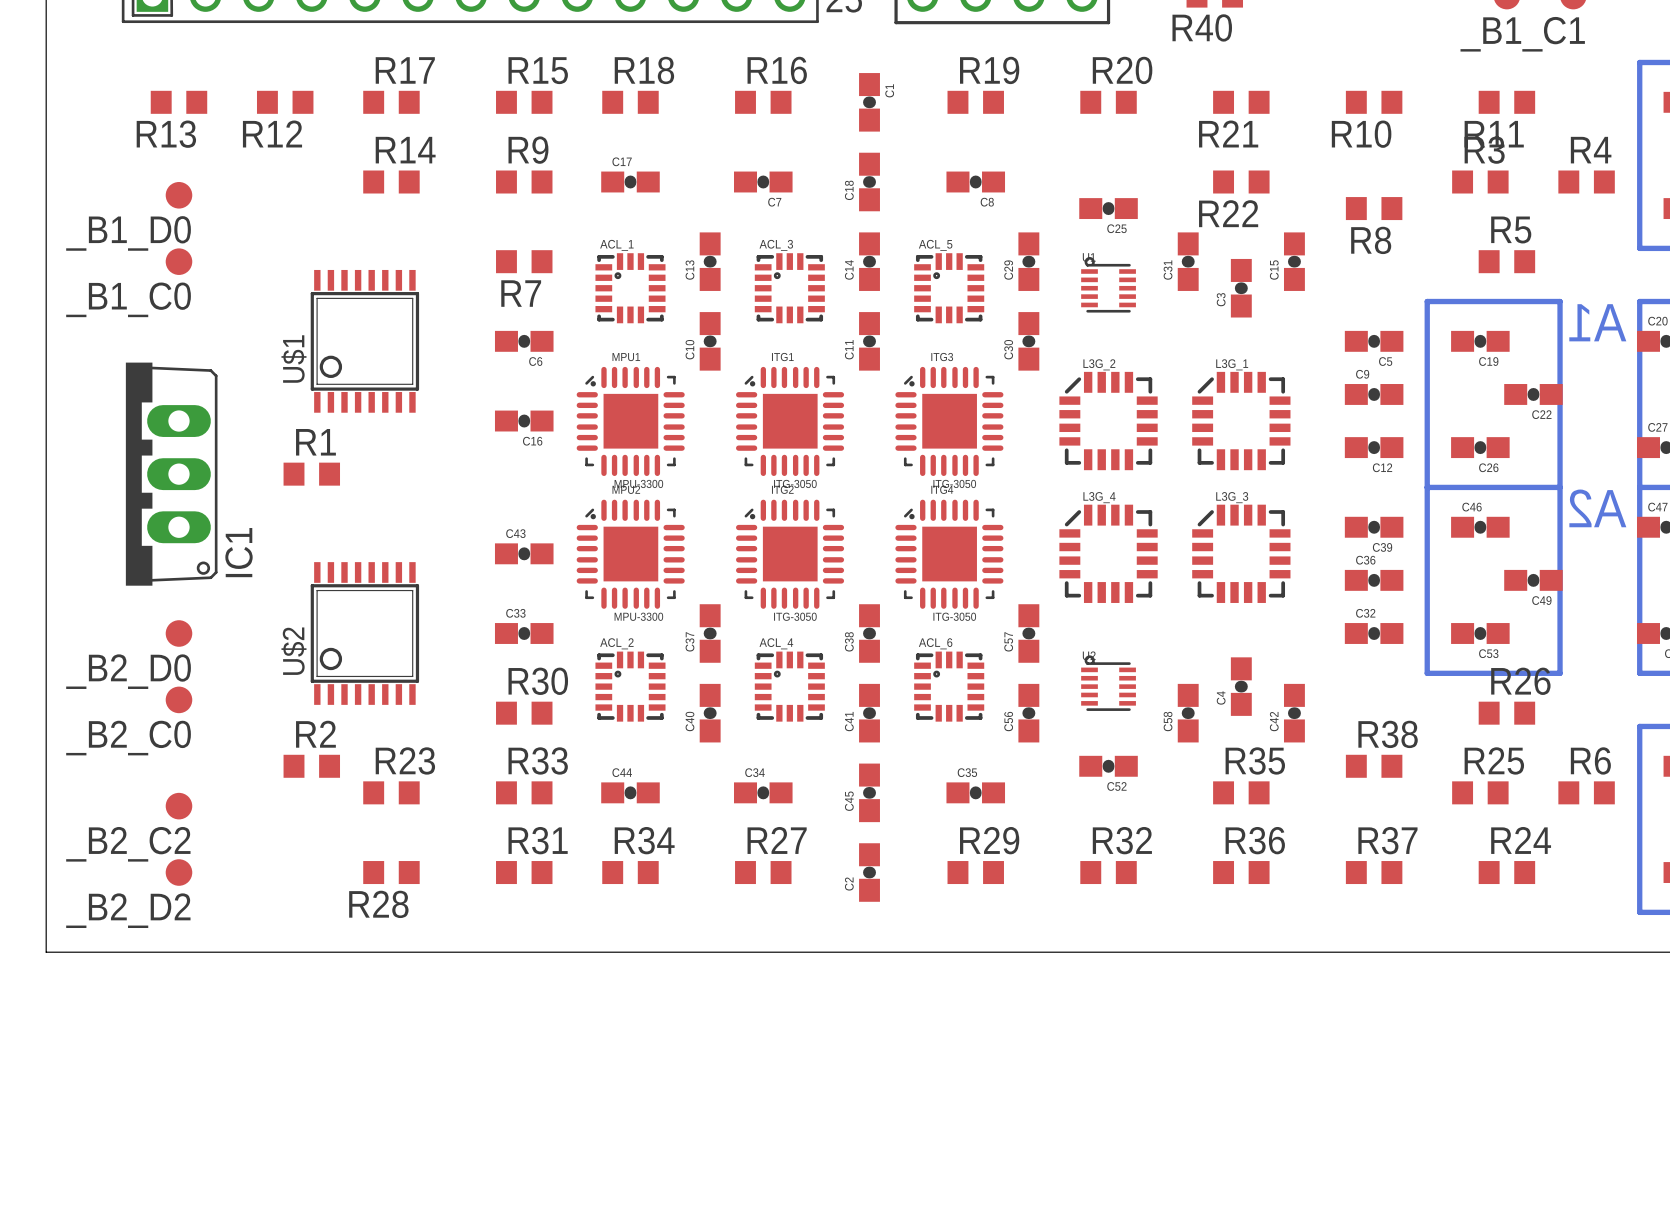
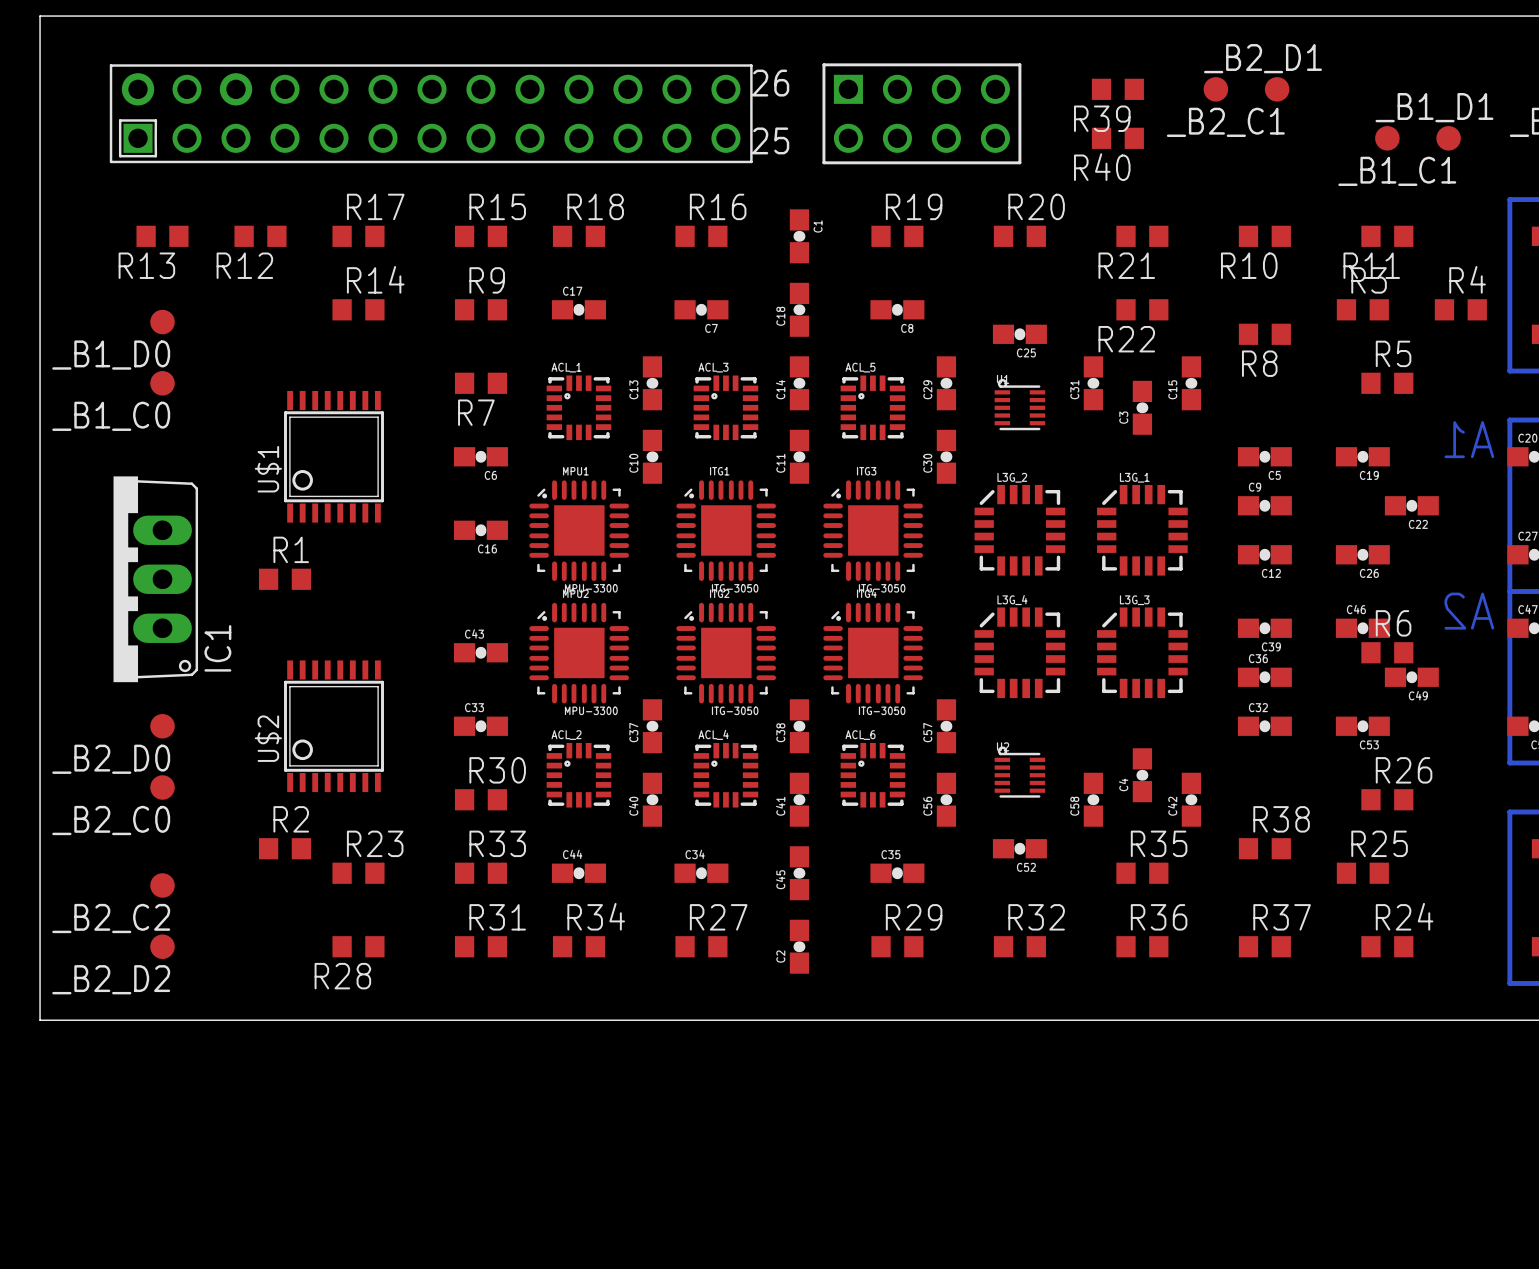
bottom track: (1427, 301) (1560, 301) (1560, 673) (1427, 673) (1427, 301) -> none
bottom track: (1427, 487) (1560, 487) -> none
R6 position: (1586, 792) -> (1387, 652)

